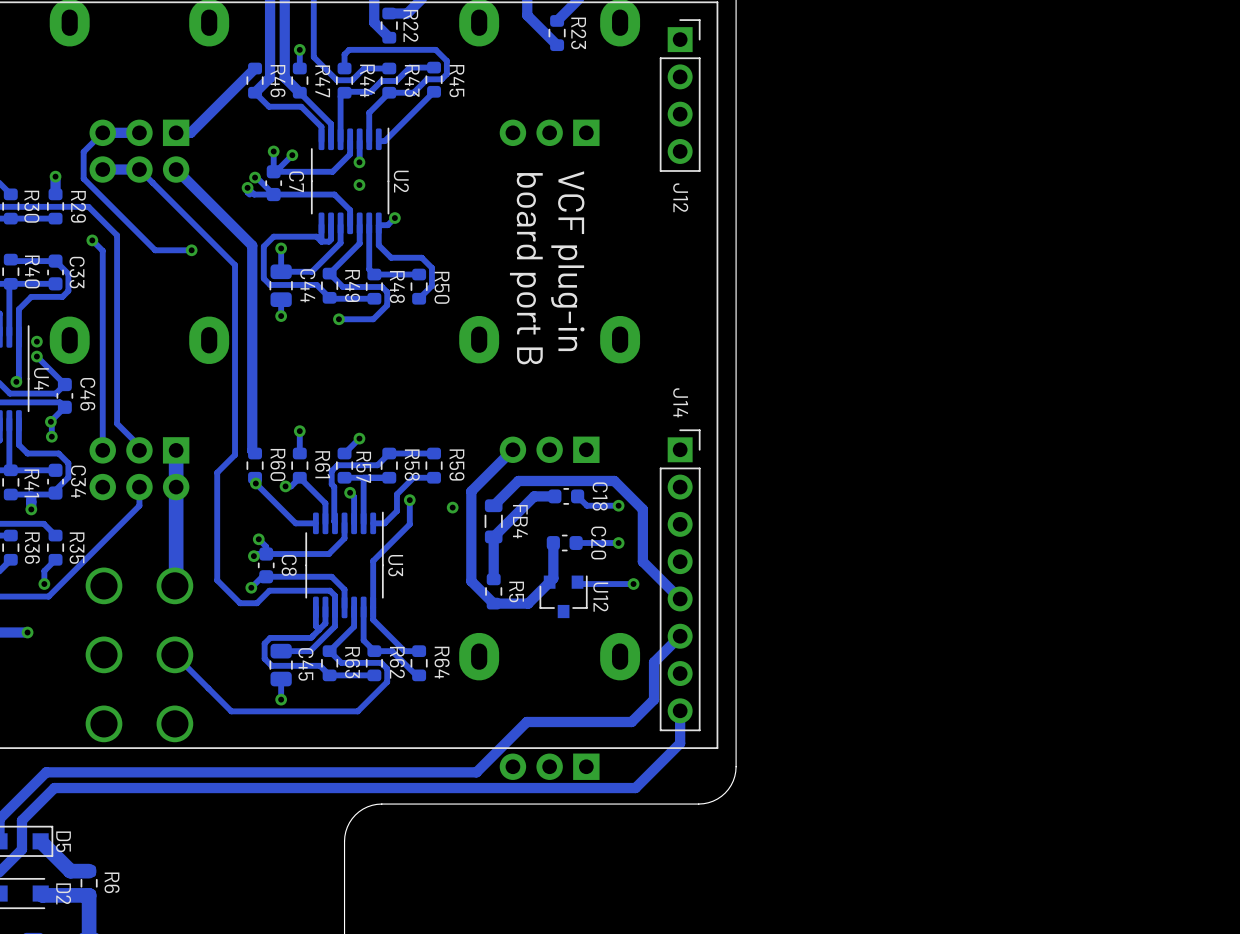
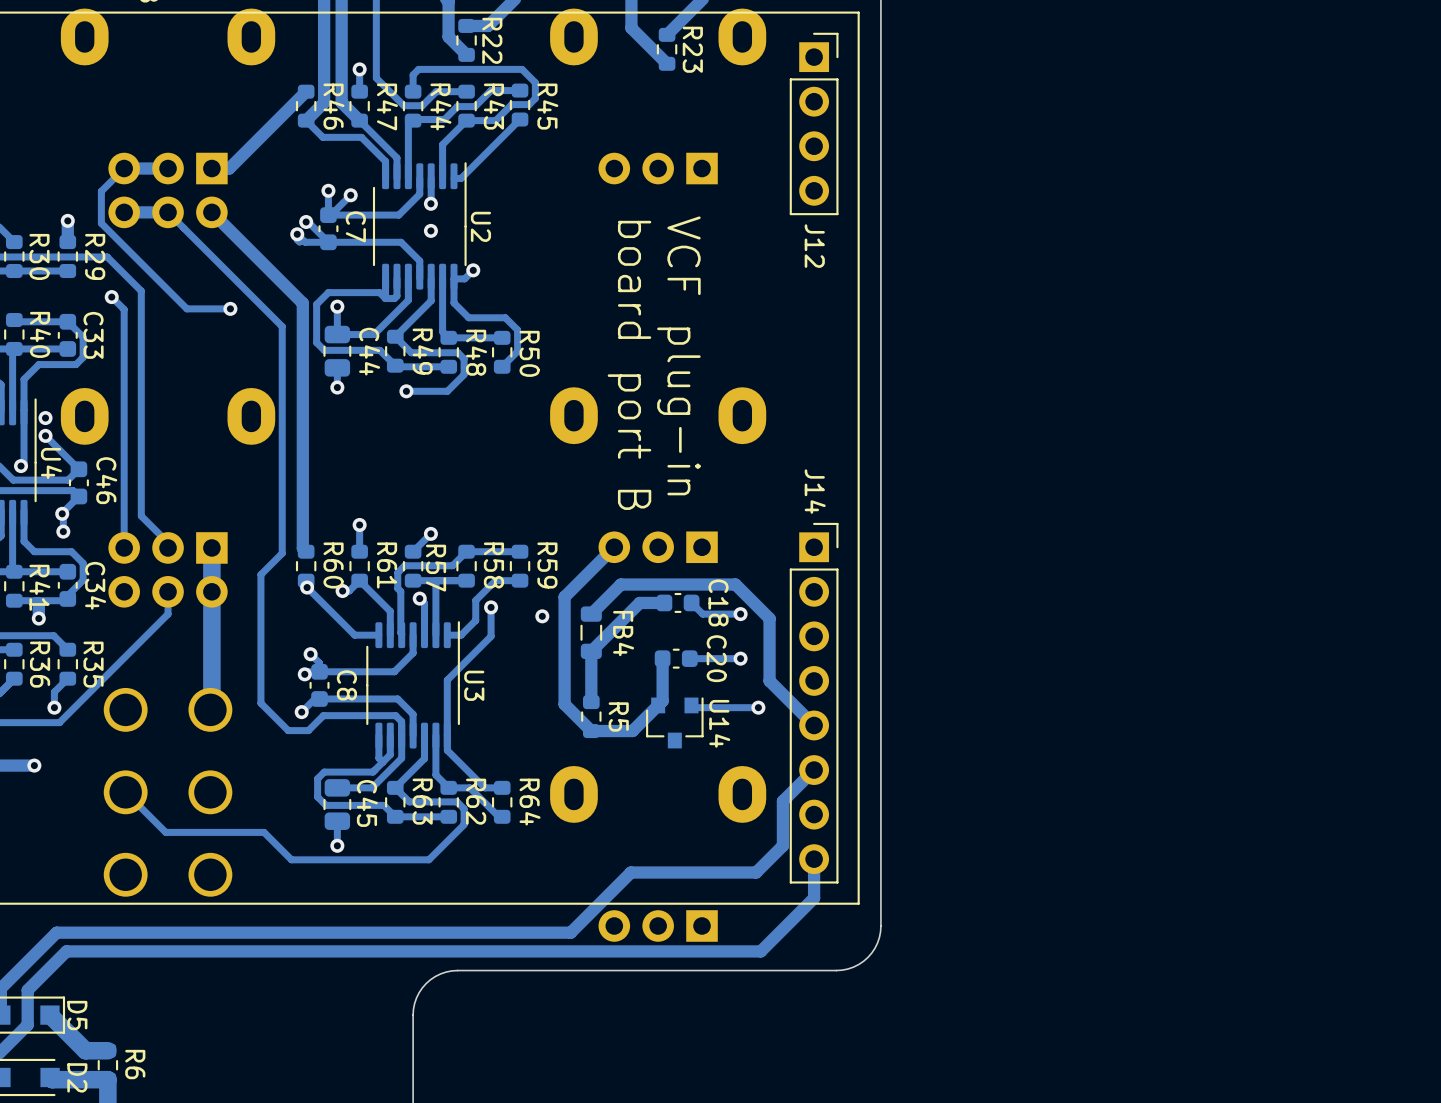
U12 name: U12 (600, 597) -> U14 (719, 723)
track: (174, 654) (231, 711) (242, 711) -> (125, 792) (165, 832) (264, 832) (291, 859)

